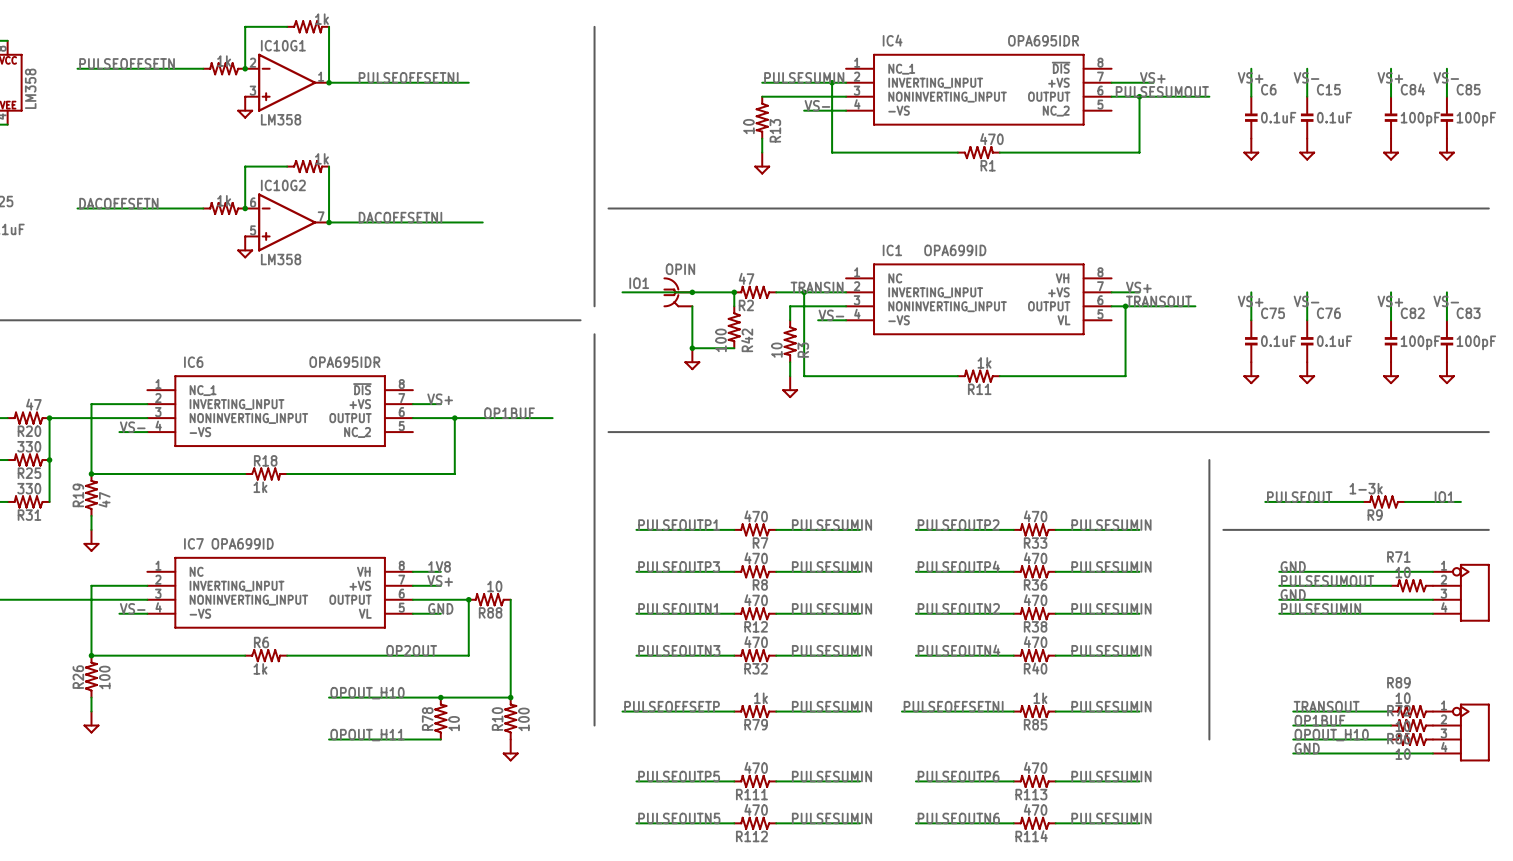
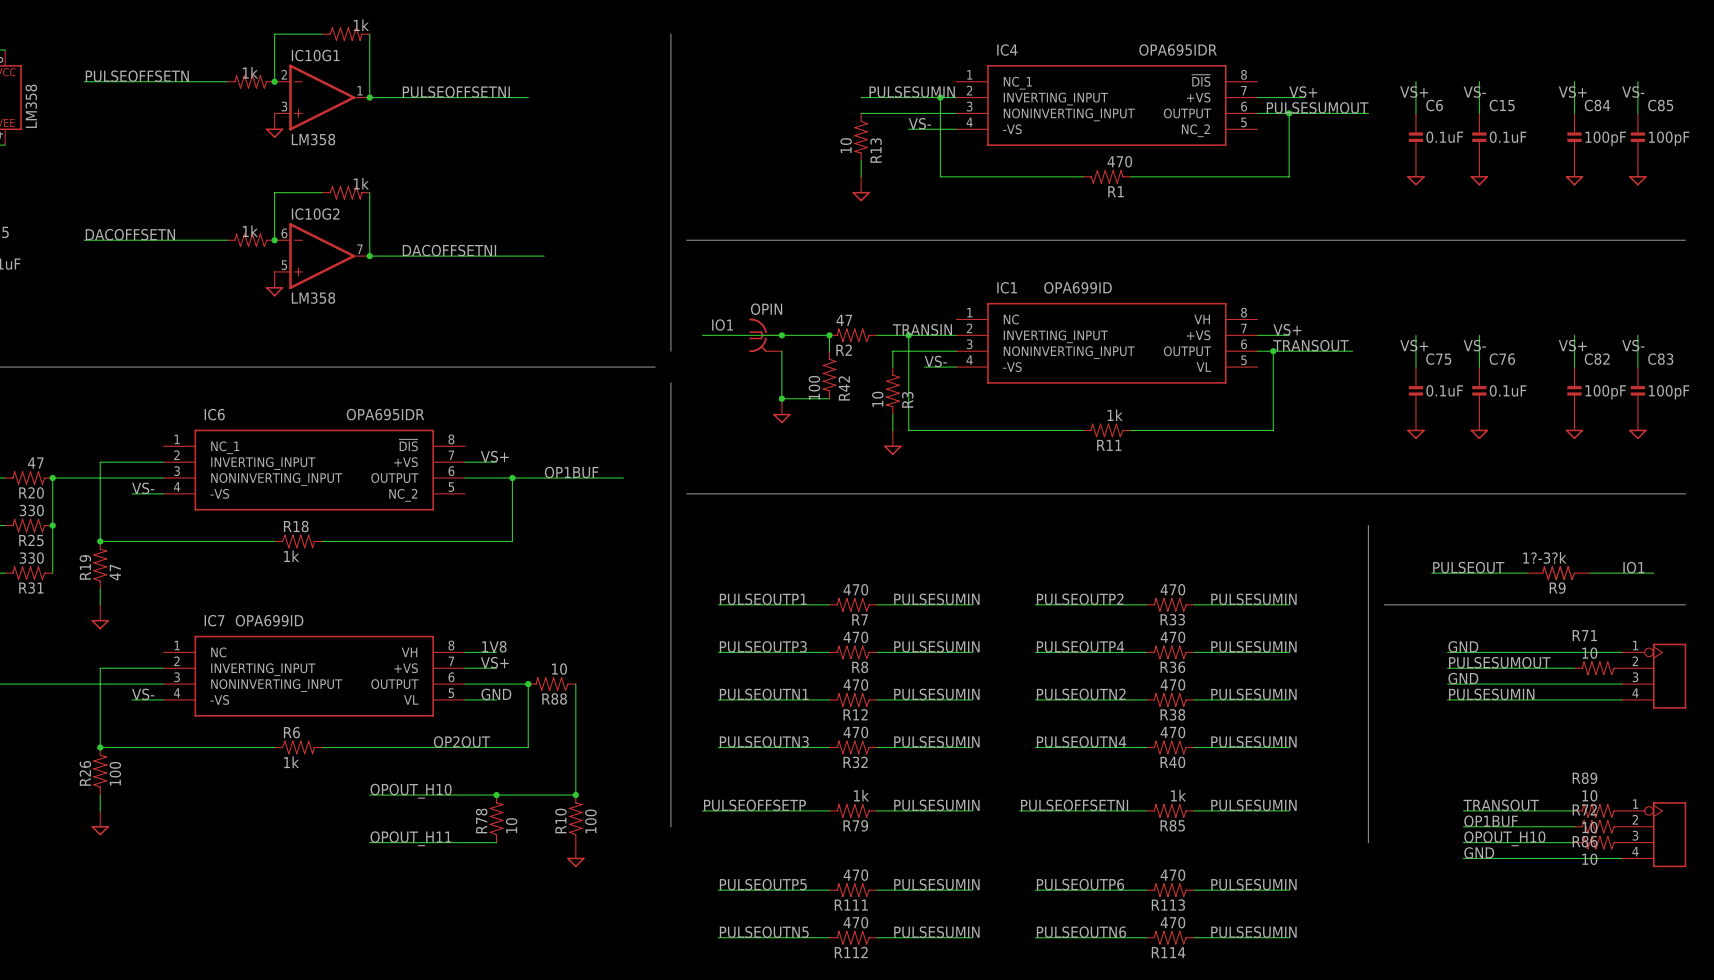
R9 value: 1-3k (1366, 488) -> 1?-3?k (1544, 557)
R9 symbol: [1362, 495, 1406, 508] -> [1526, 566, 1591, 581]

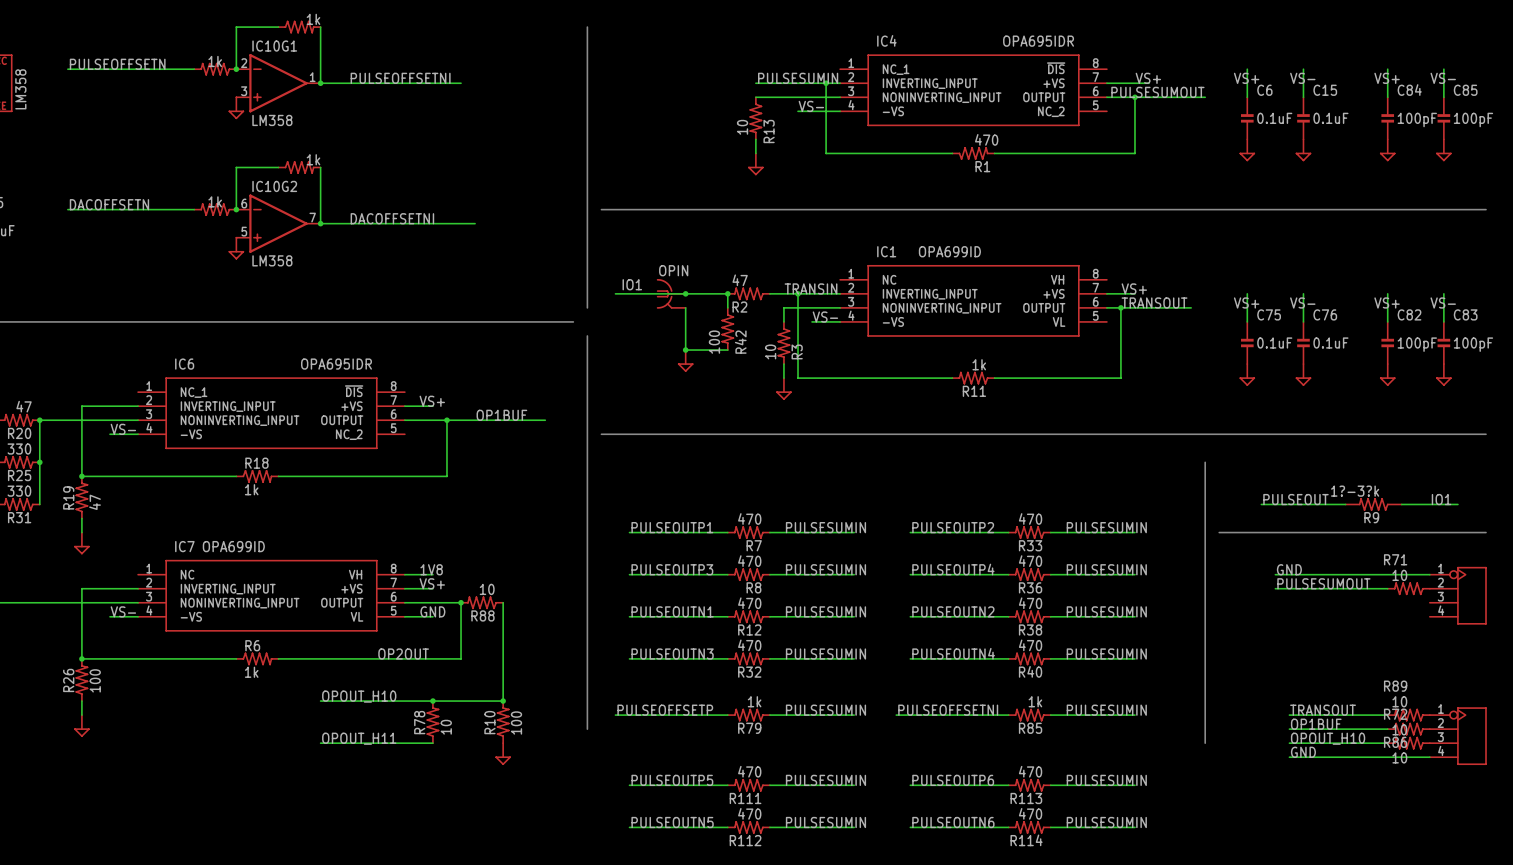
label: GND (1463, 678) -> none
wire: (1447, 684) (1622, 684) -> none
label: PULSESUMIN (1491, 694) -> none
wire: (1447, 699) (1622, 699) -> none

